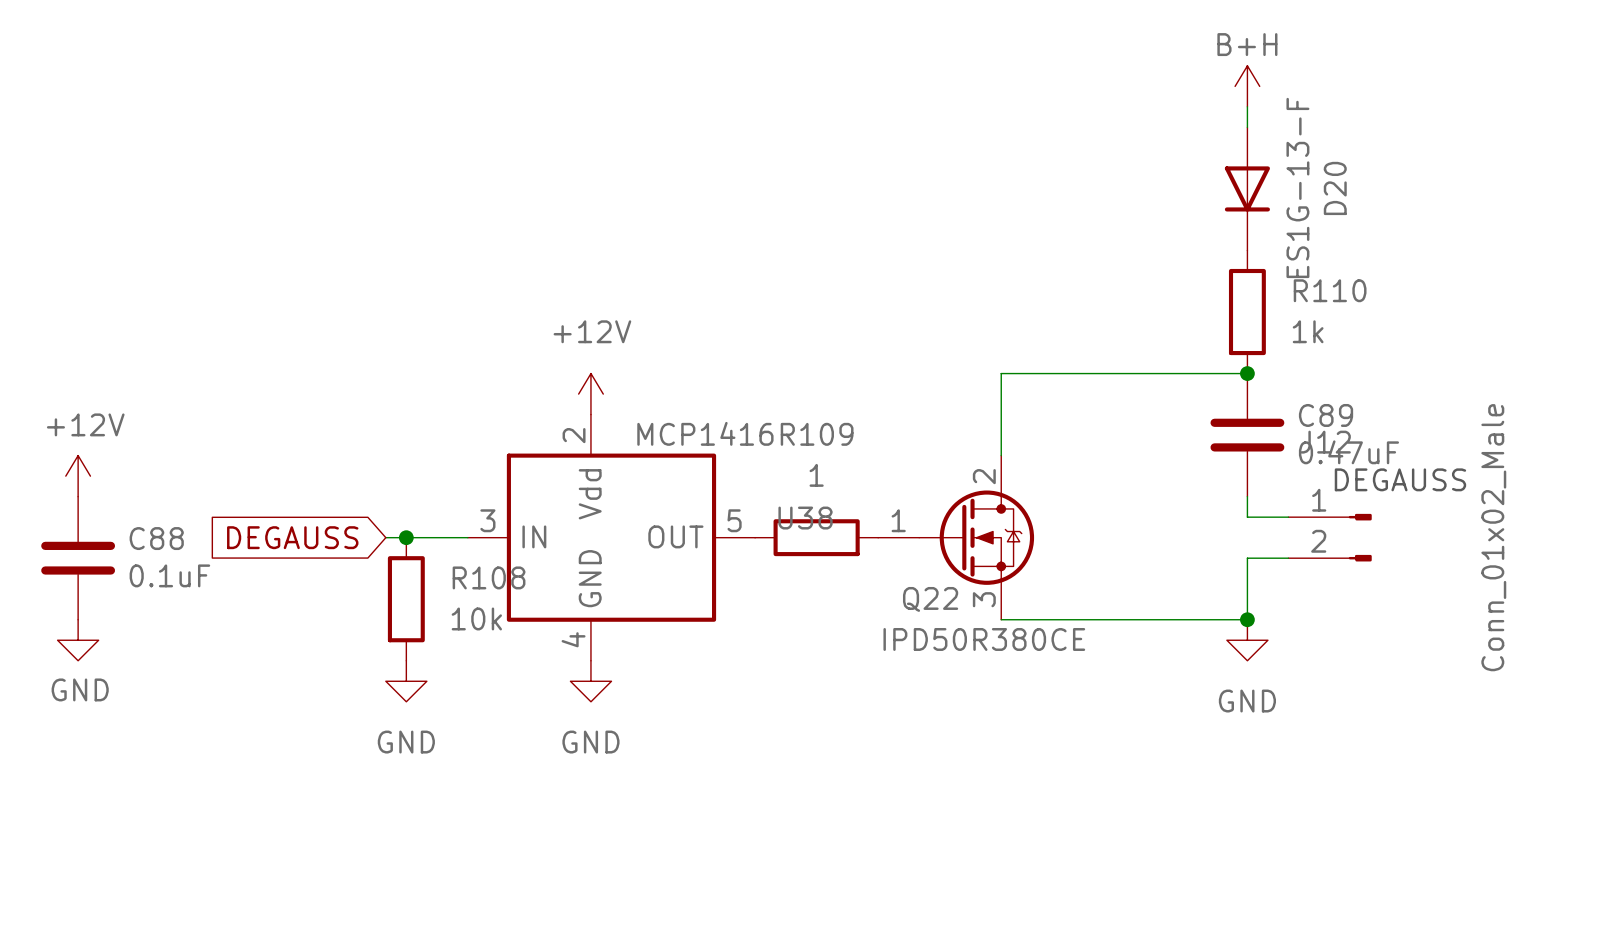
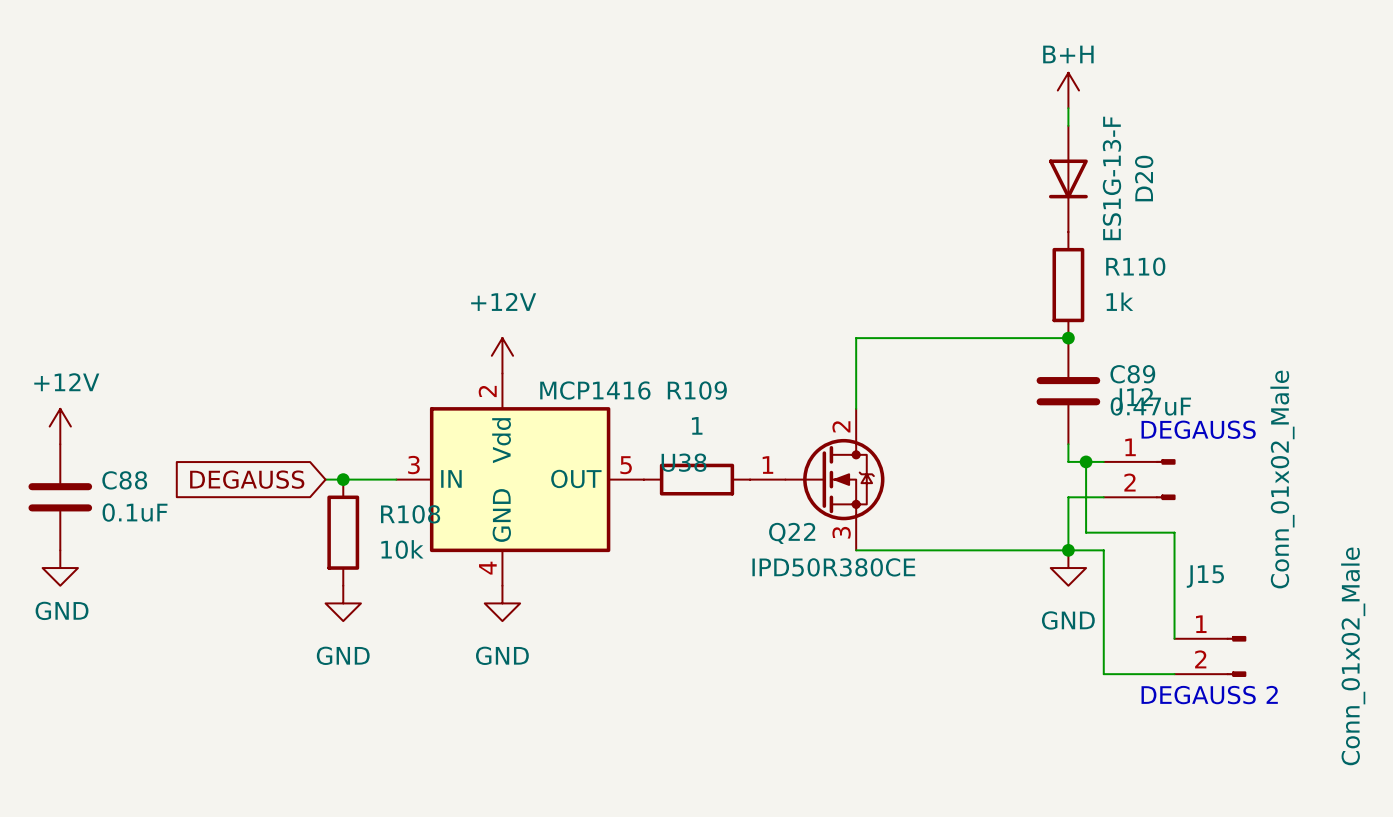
wire: none -> (1086, 461) (1086, 532) (1174, 532) (1174, 638)
junction: none -> (1086, 461)
wire: none -> (1068, 550) (1103, 550) (1103, 674) (1174, 674)
J15: none -> Conn_01x02_Male (1210, 656)
text: none -> DEGAUSS 2 (1209, 695)

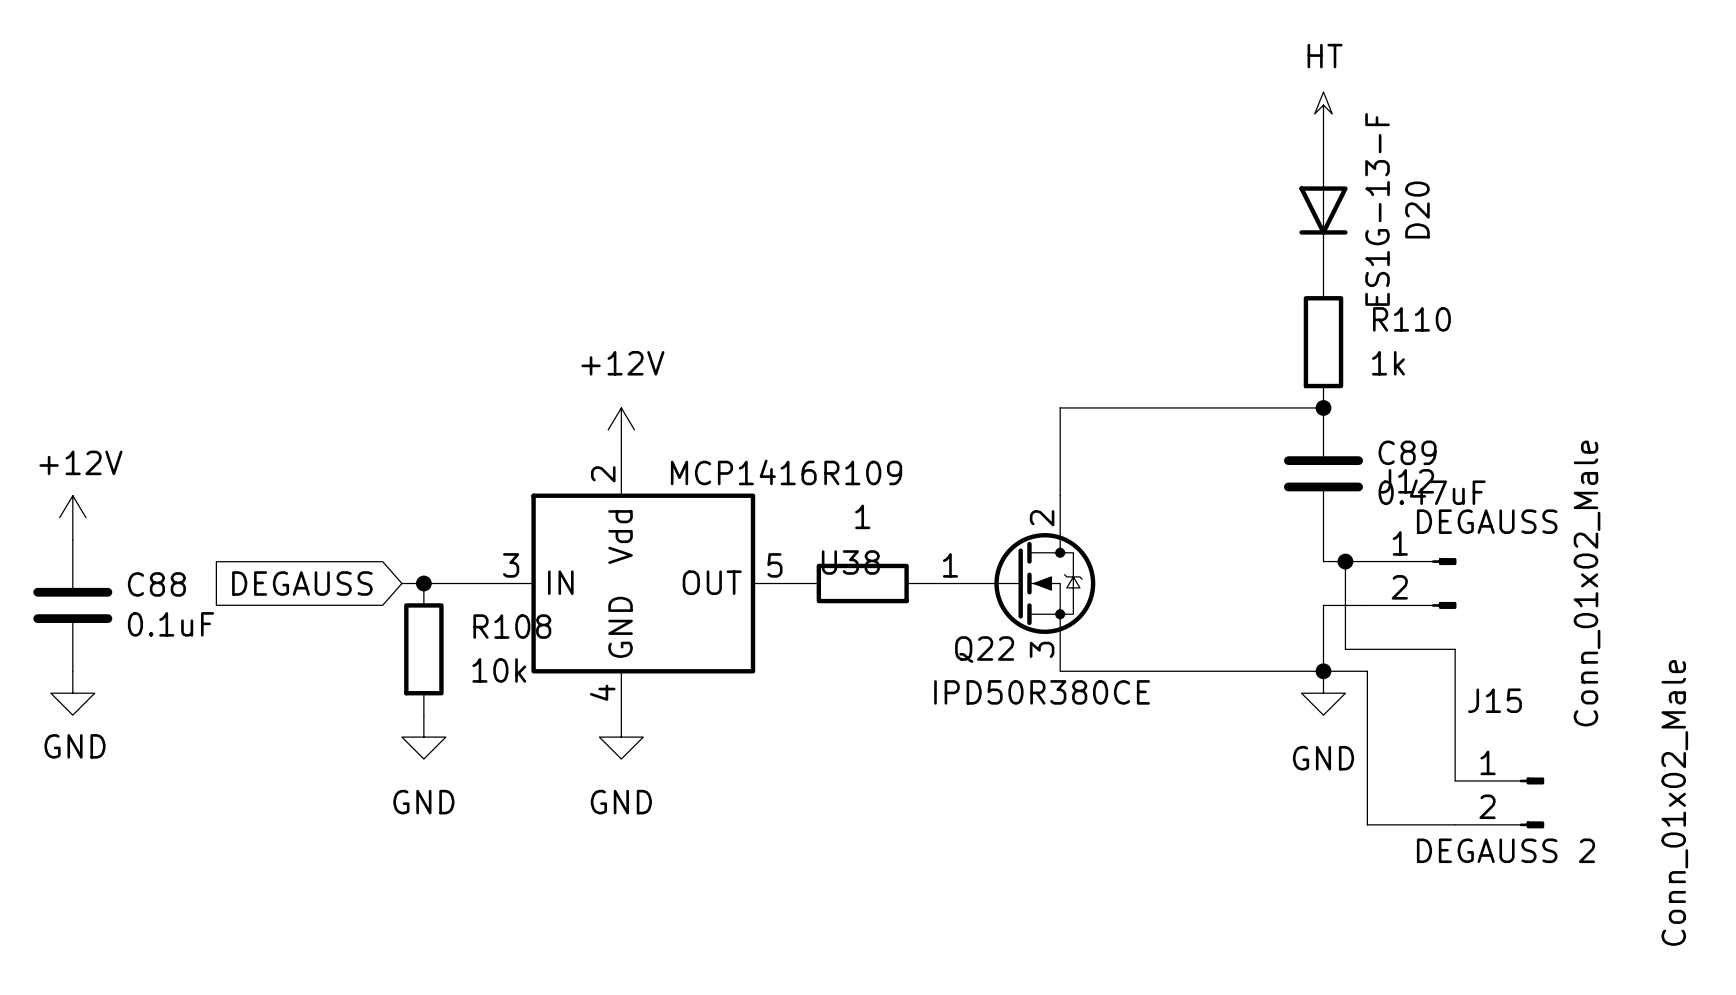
power symbol: B+H (1068, 90) -> HT (1323, 107)

